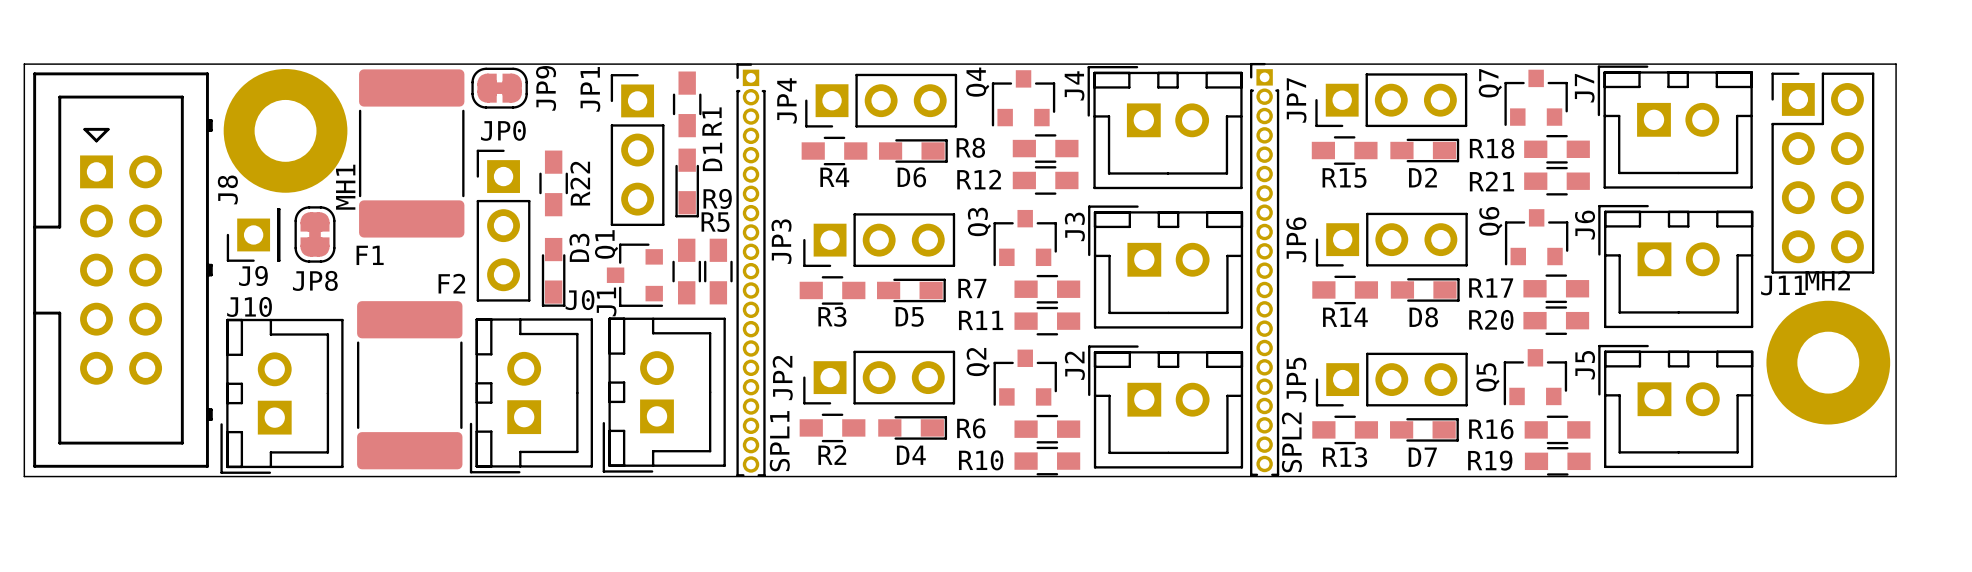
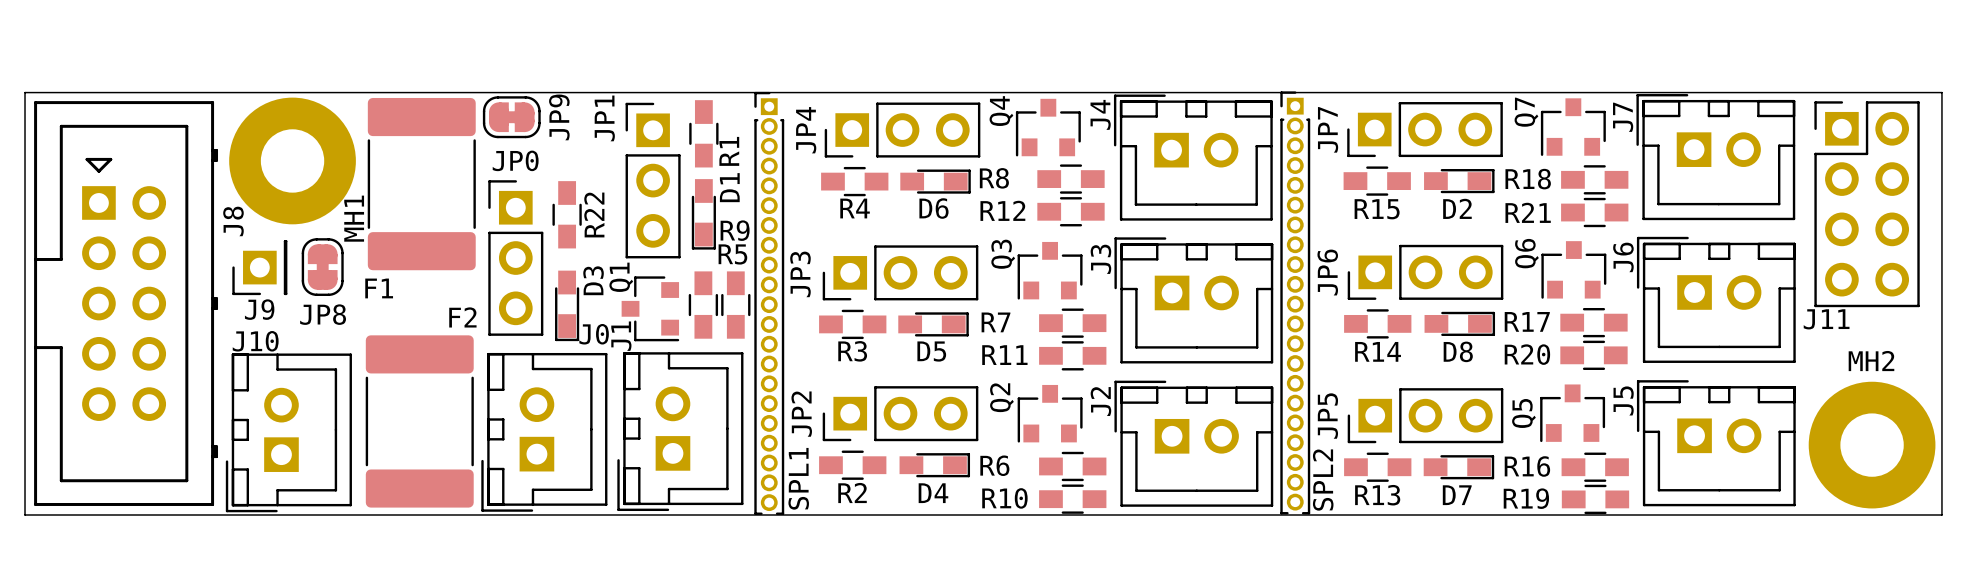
MH2 position: (1828, 362) -> (1872, 445)

